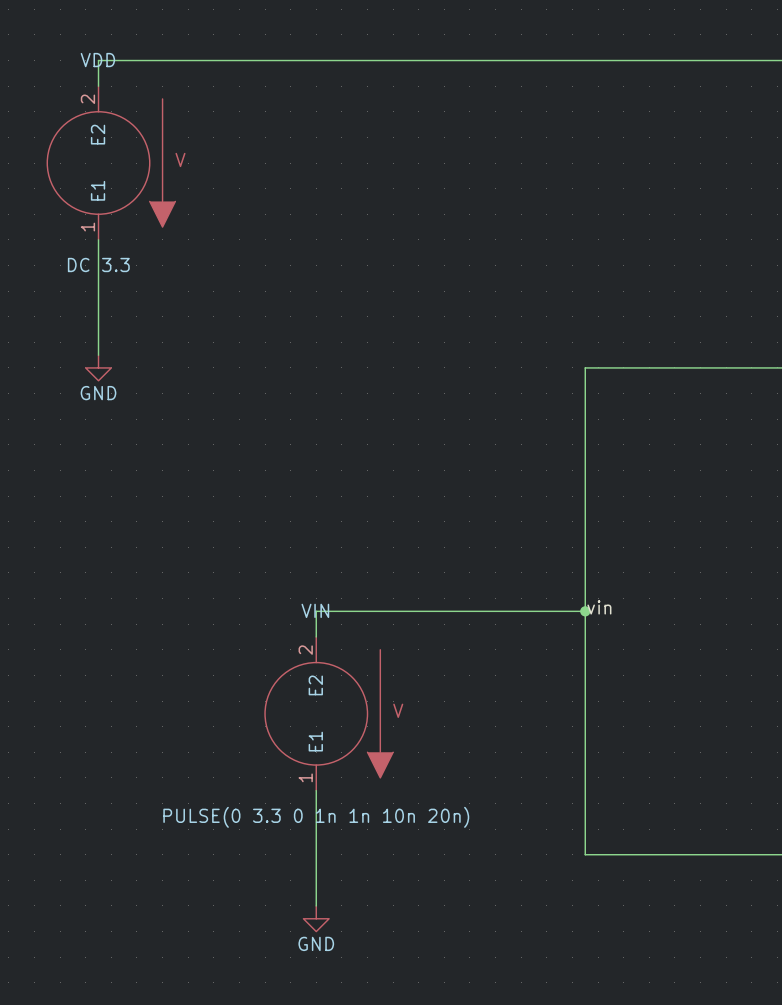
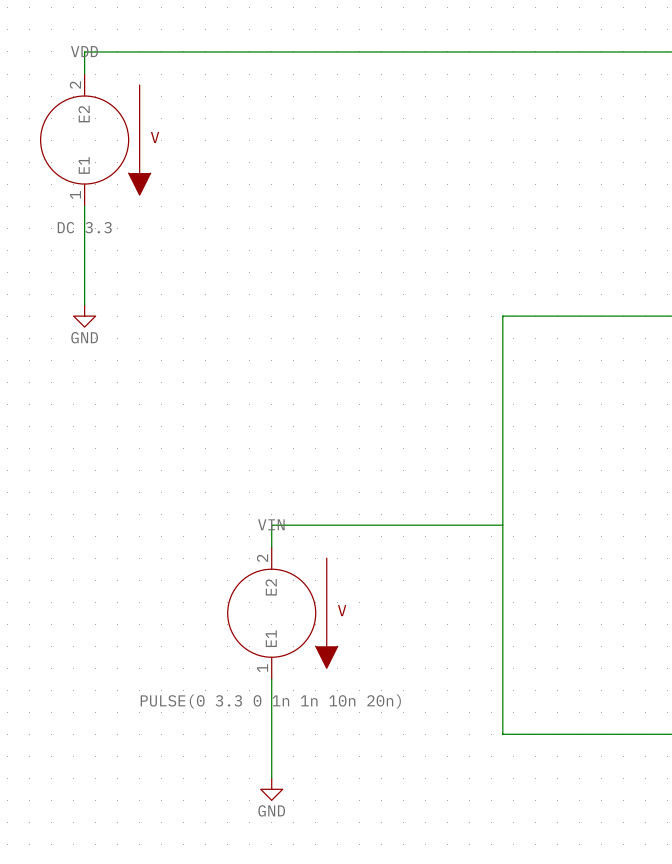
label: vin (599, 607) -> none
junction: (585, 611) -> none

